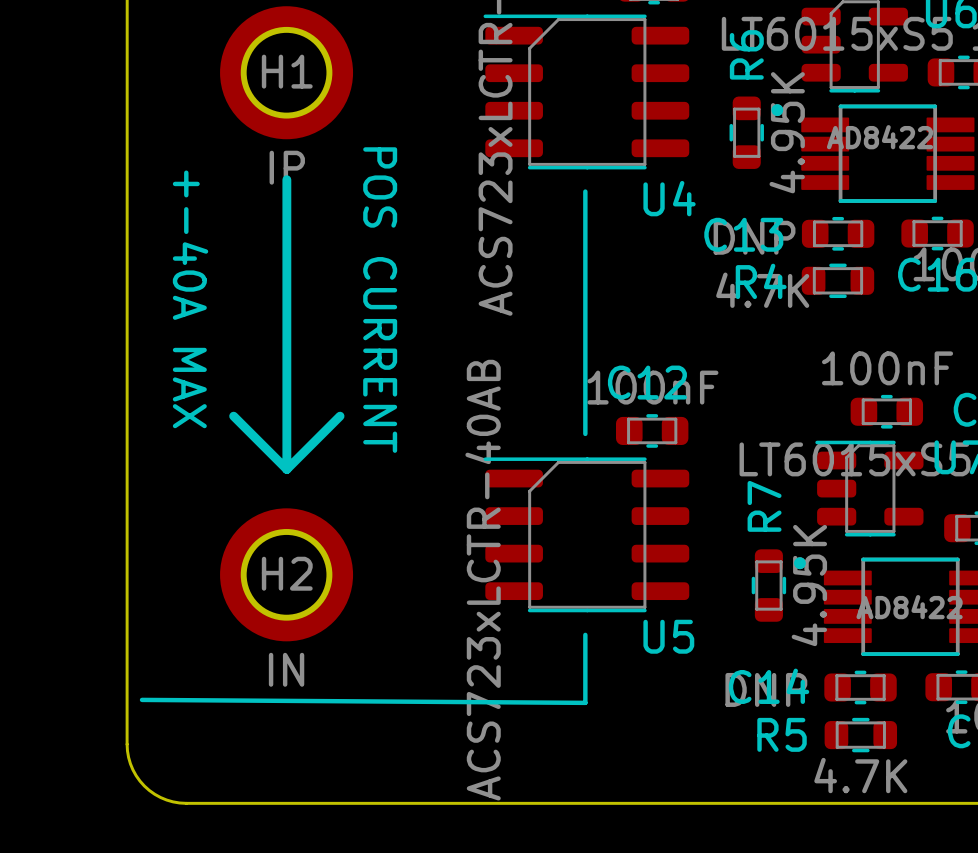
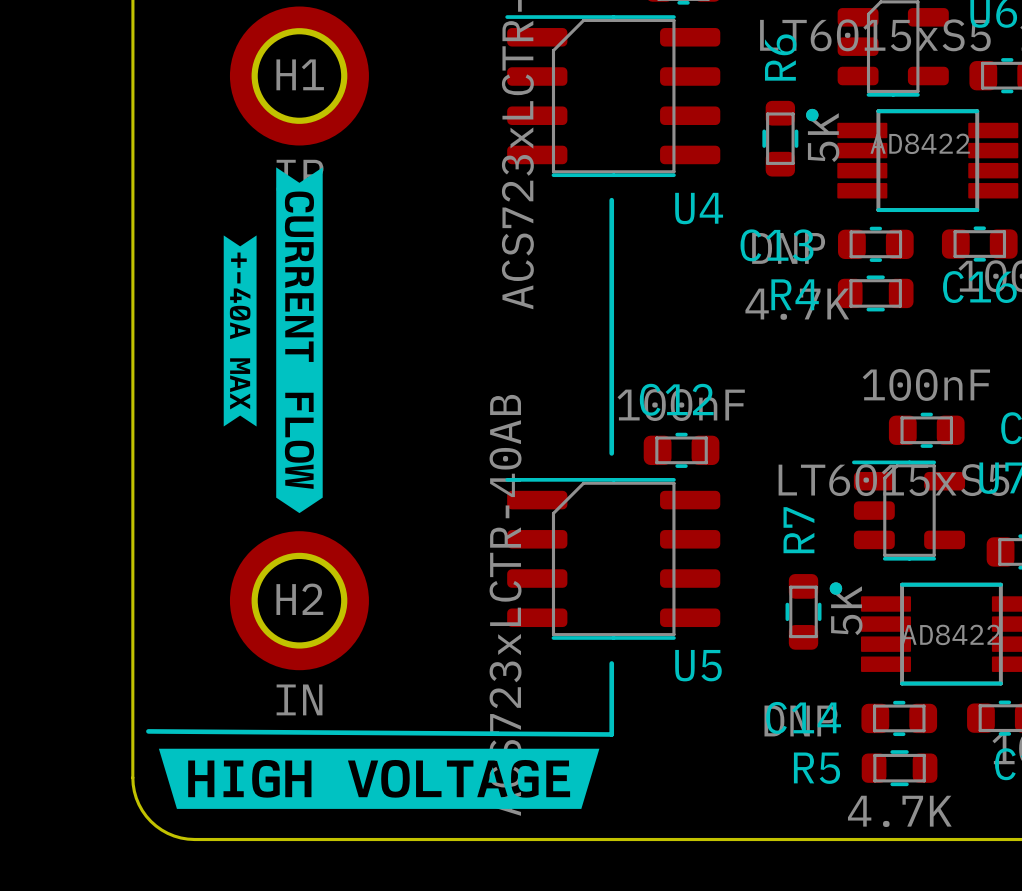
R6 value: 4.95K (787, 132) -> 5K (823, 137)
drawing: none -> [223, 167, 323, 514]
line: (286, 179) (286, 469) -> none
text: +-40A MAX (190, 299) -> none
text: POS CURRENT (380, 300) -> none
line: (233, 416) (286, 469) -> none
line: (340, 416) (286, 469) -> none
R7 value: 4.95K (809, 585) -> 5K (846, 610)
drawing: none -> [158, 748, 600, 809]

